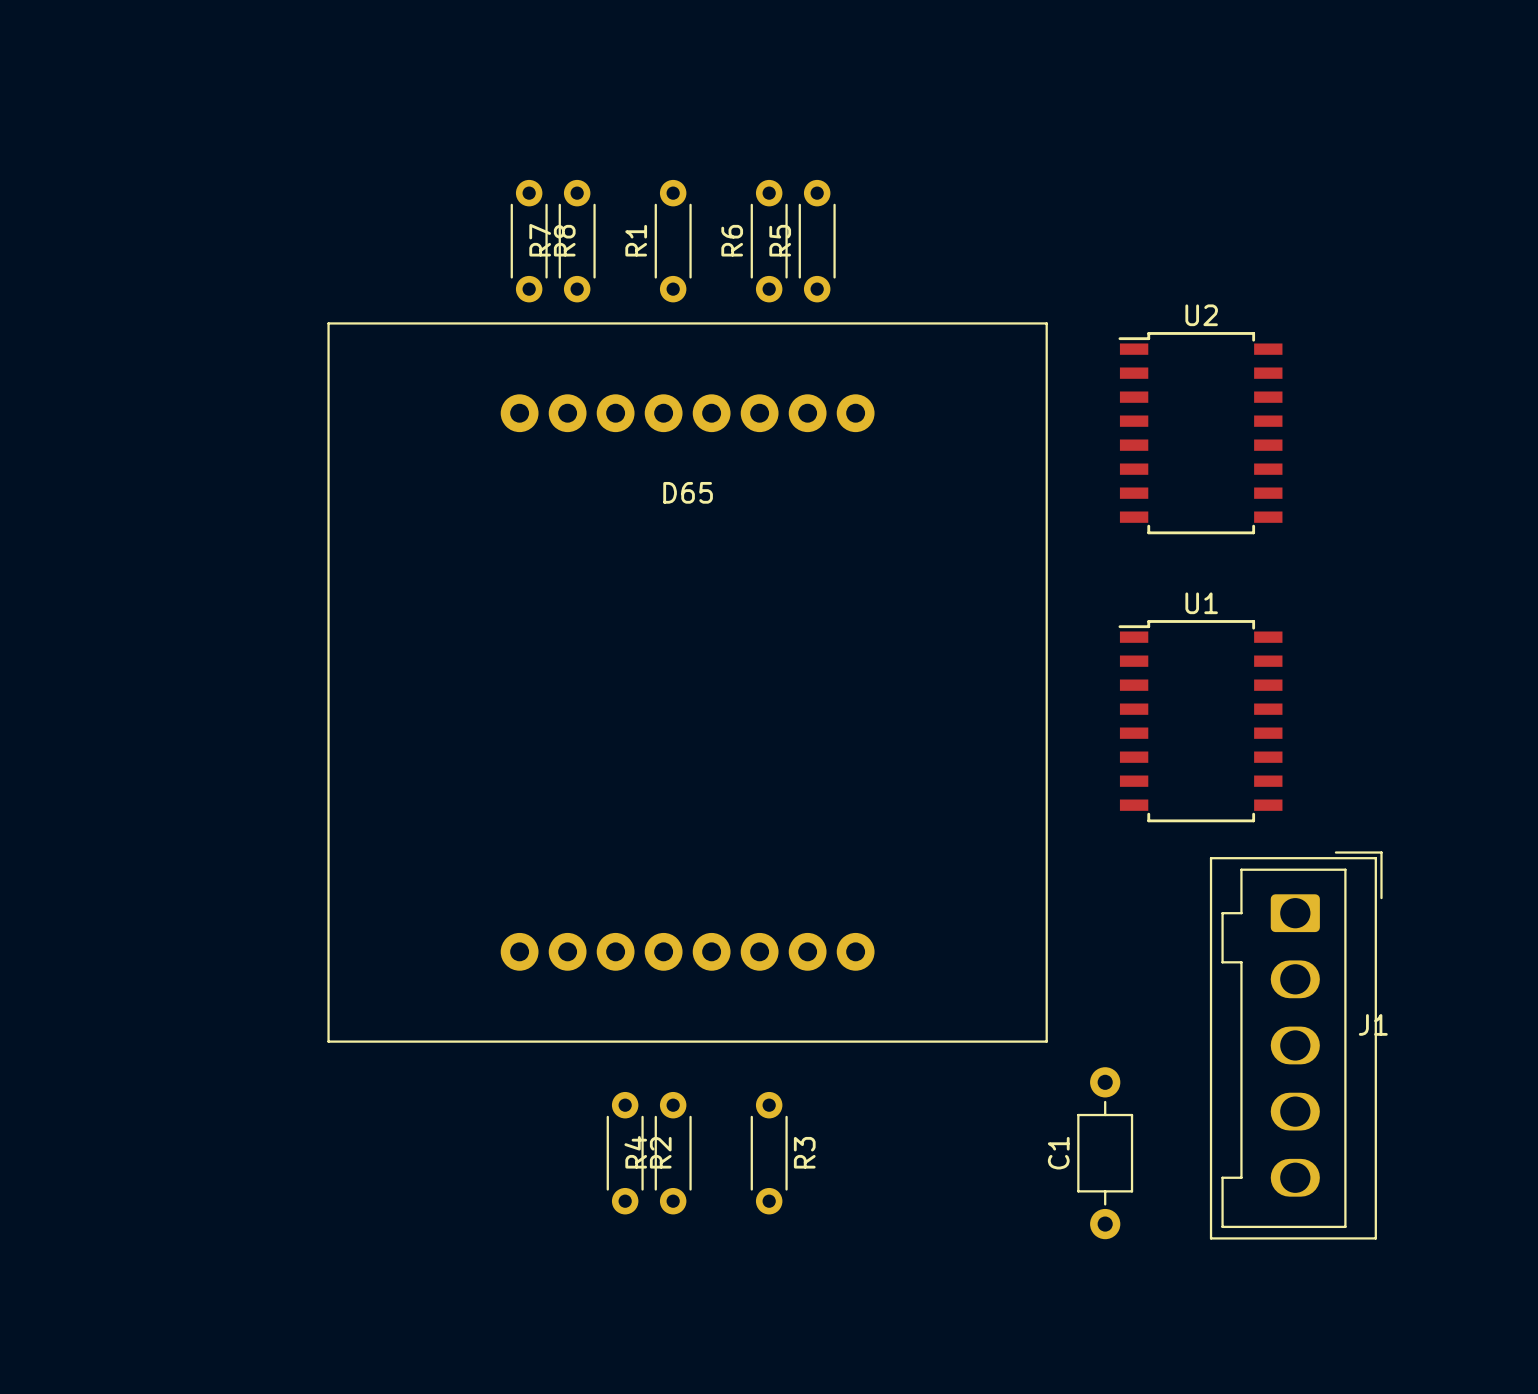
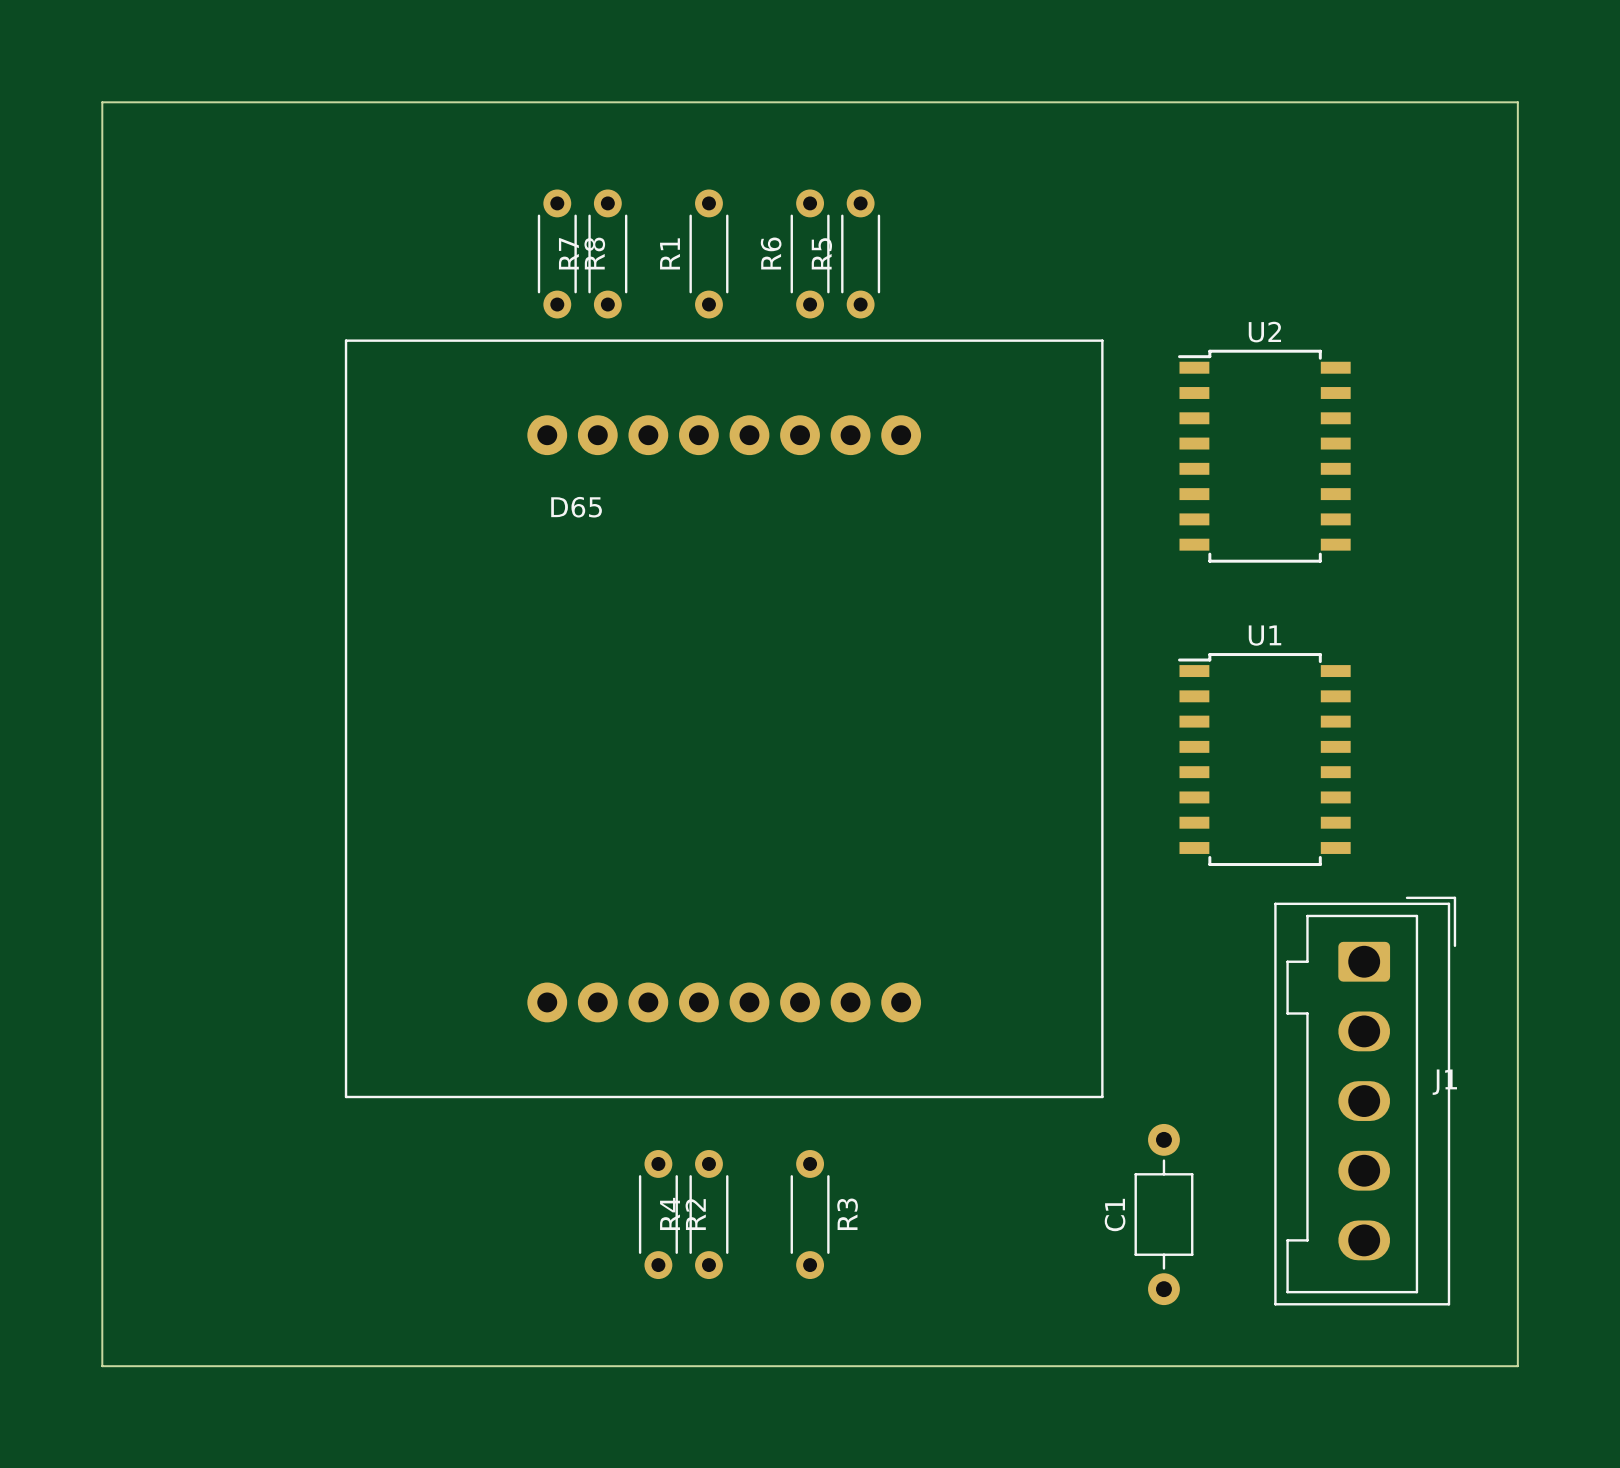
board edge: none -> (102, 102) (1517, 102) (1517, 1366) (102, 1366) (102, 102)
D65 name position: D65 (688, 492) -> D65 (576, 507)

